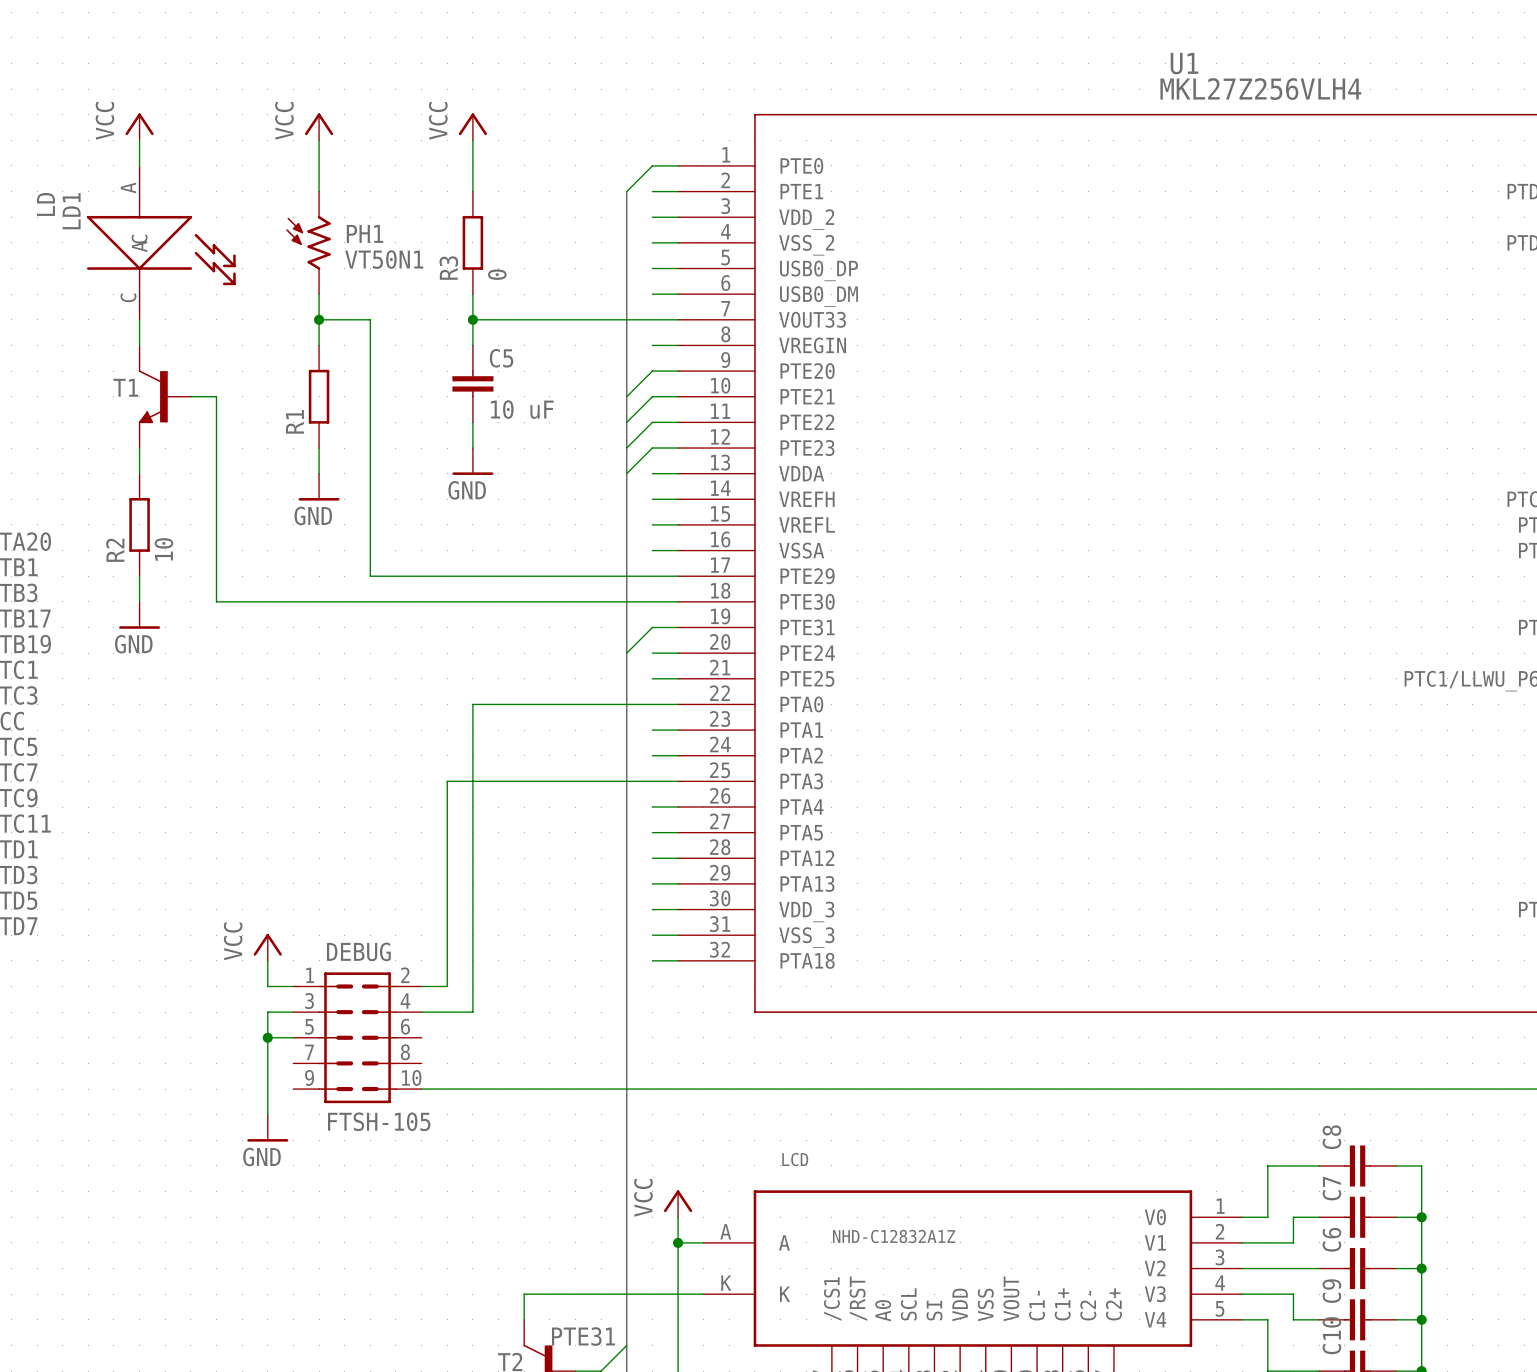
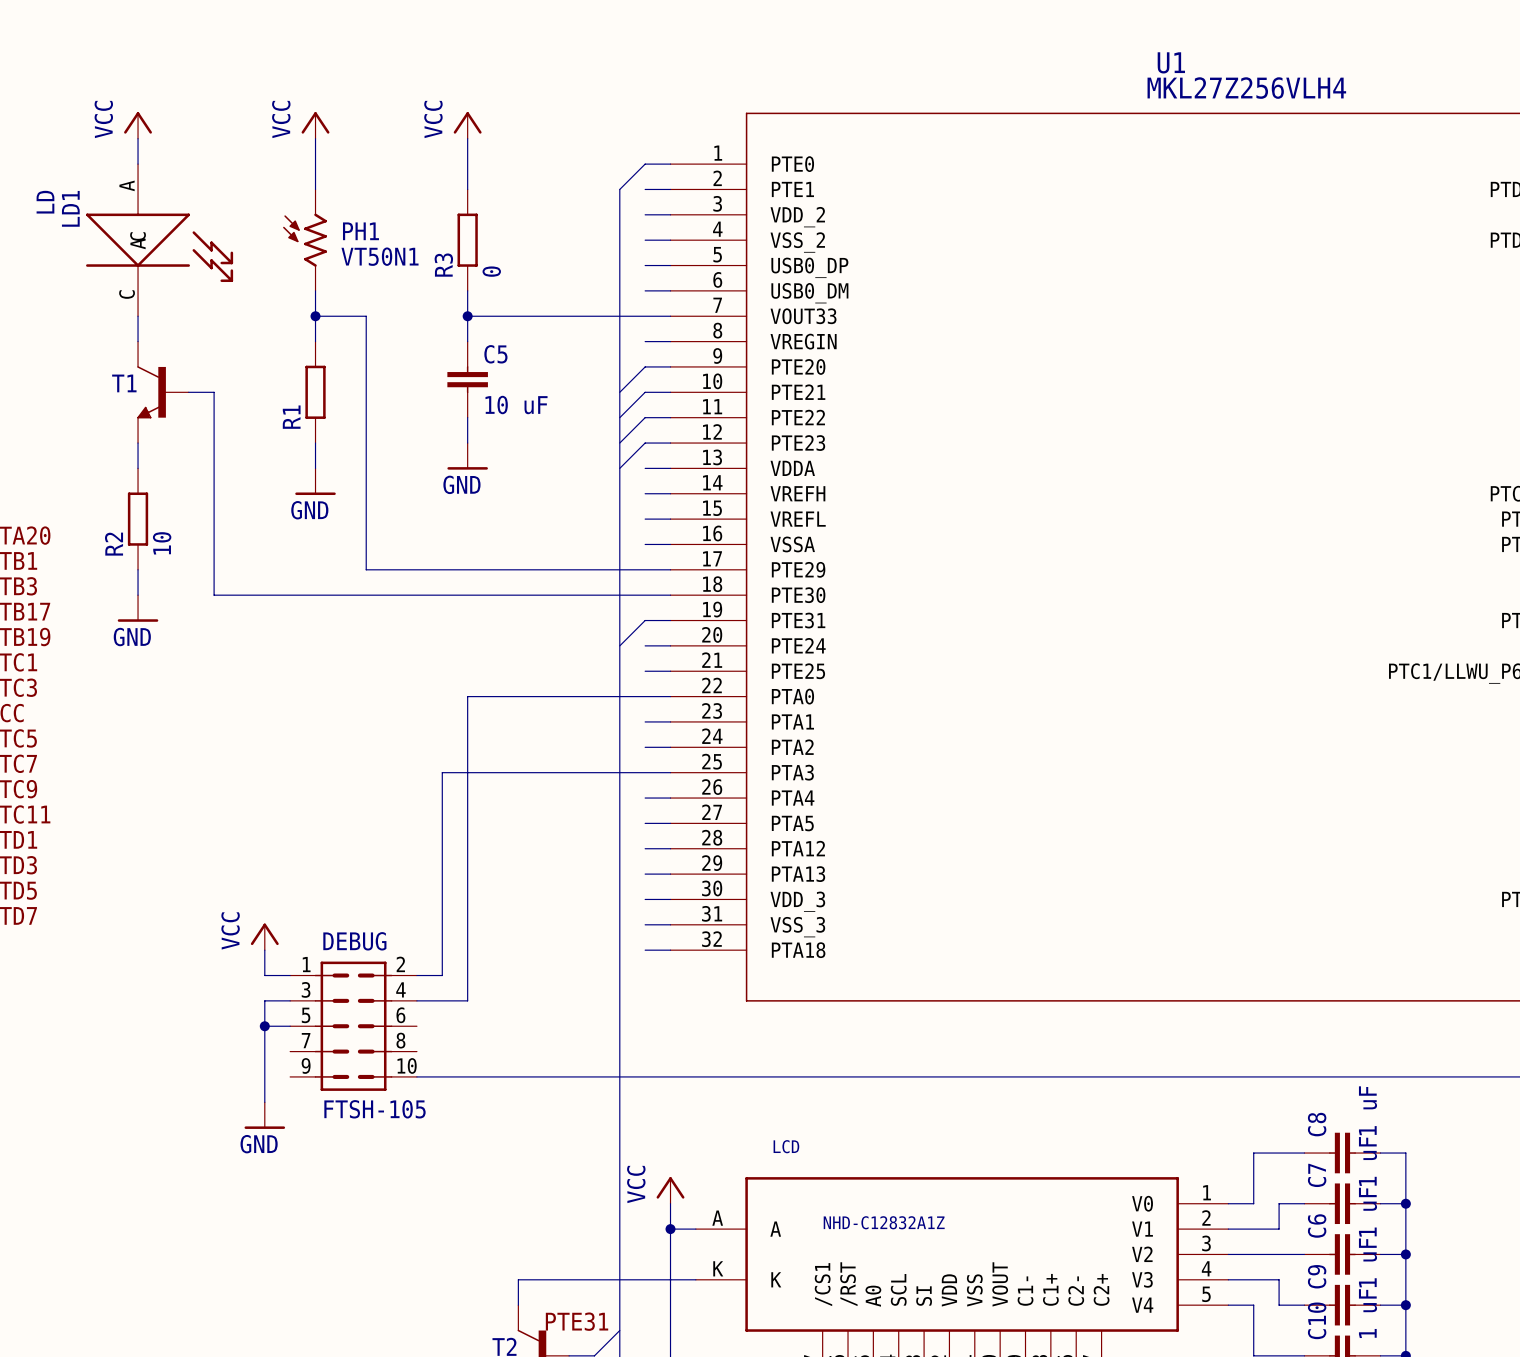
C8 value: none -> 1 uF (1368, 1110)
C7 value: none -> 1 uF (1368, 1161)
C6 value: none -> 1 uF (1368, 1212)
C9 value: none -> 1 uF (1368, 1262)
C10 value: none -> 1 uF (1368, 1313)

